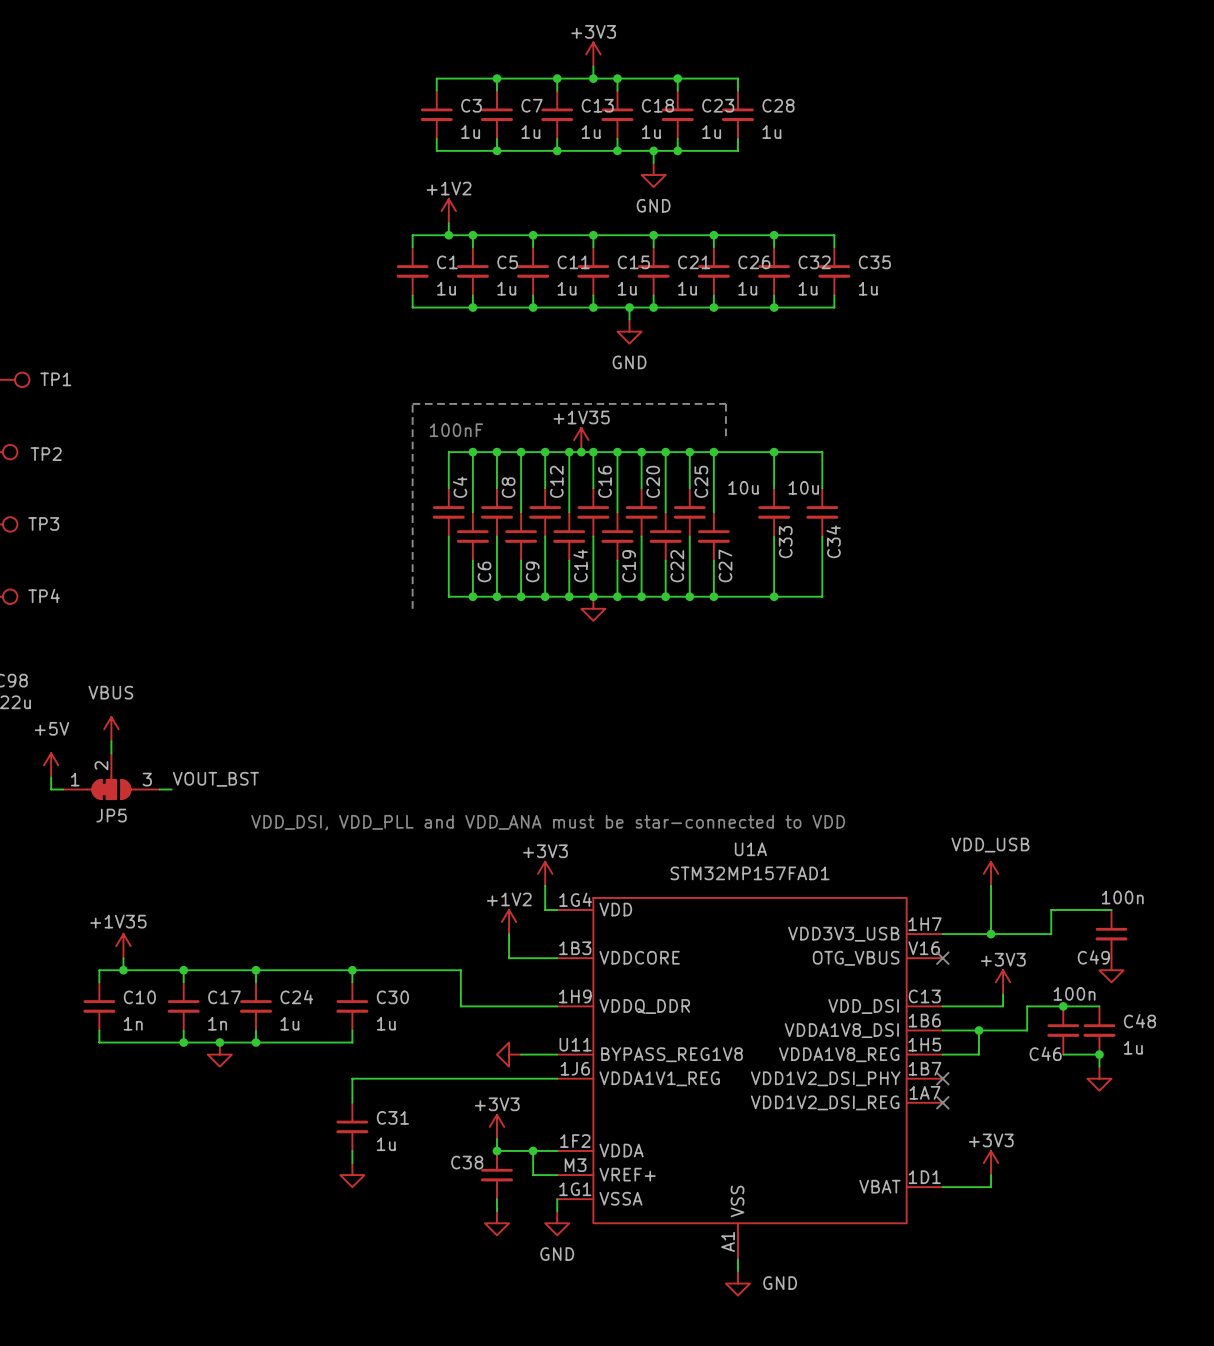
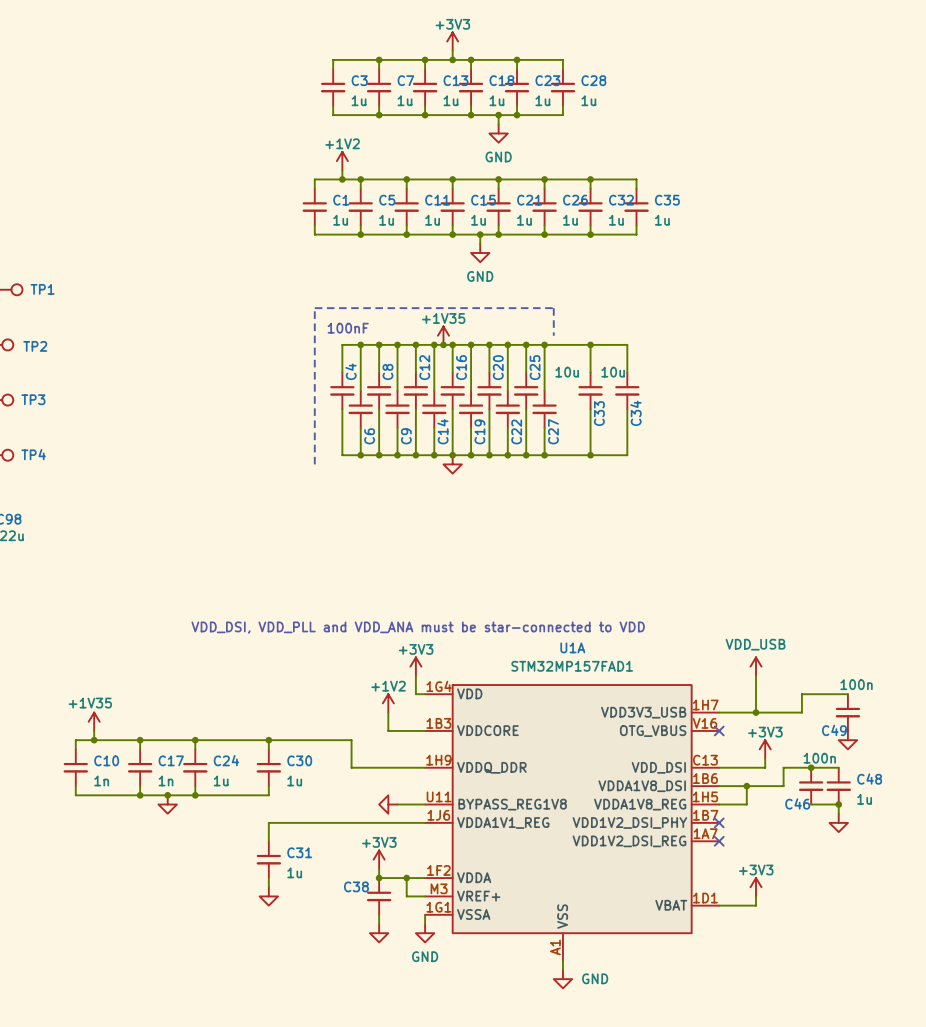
power symbol: VBUS (111, 729) -> none
wire: (111, 741) (111, 753) -> none
power symbol: +5V (51, 765) -> none
JP5: (111, 776) -> none
wire: (51, 777) (51, 789) (63, 789) -> none
label: VOUT_BST (215, 779) -> none
wire: (159, 789) (171, 789) -> none

